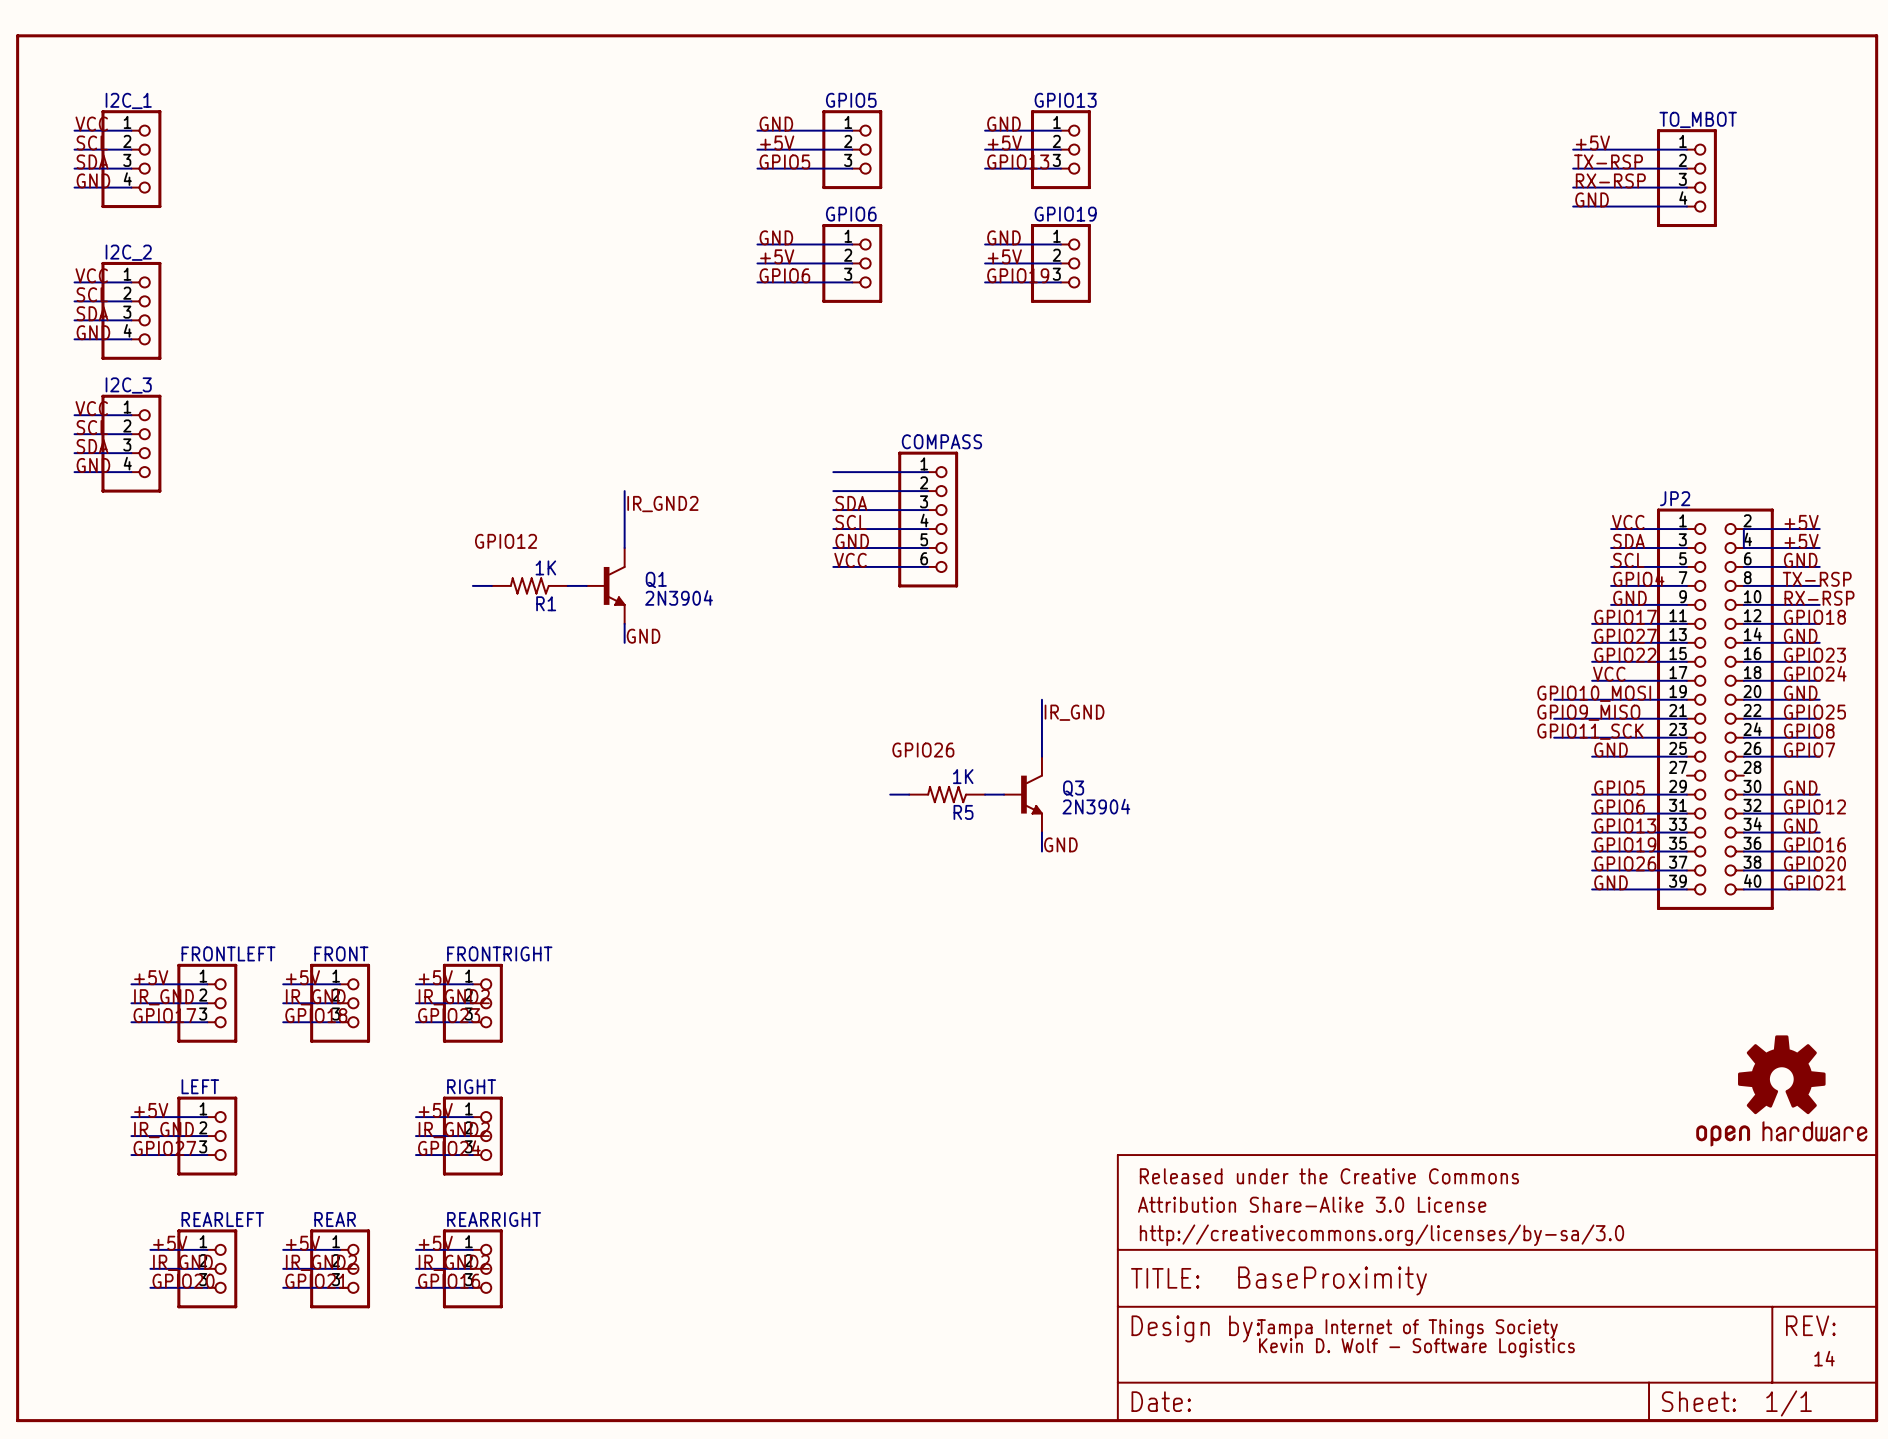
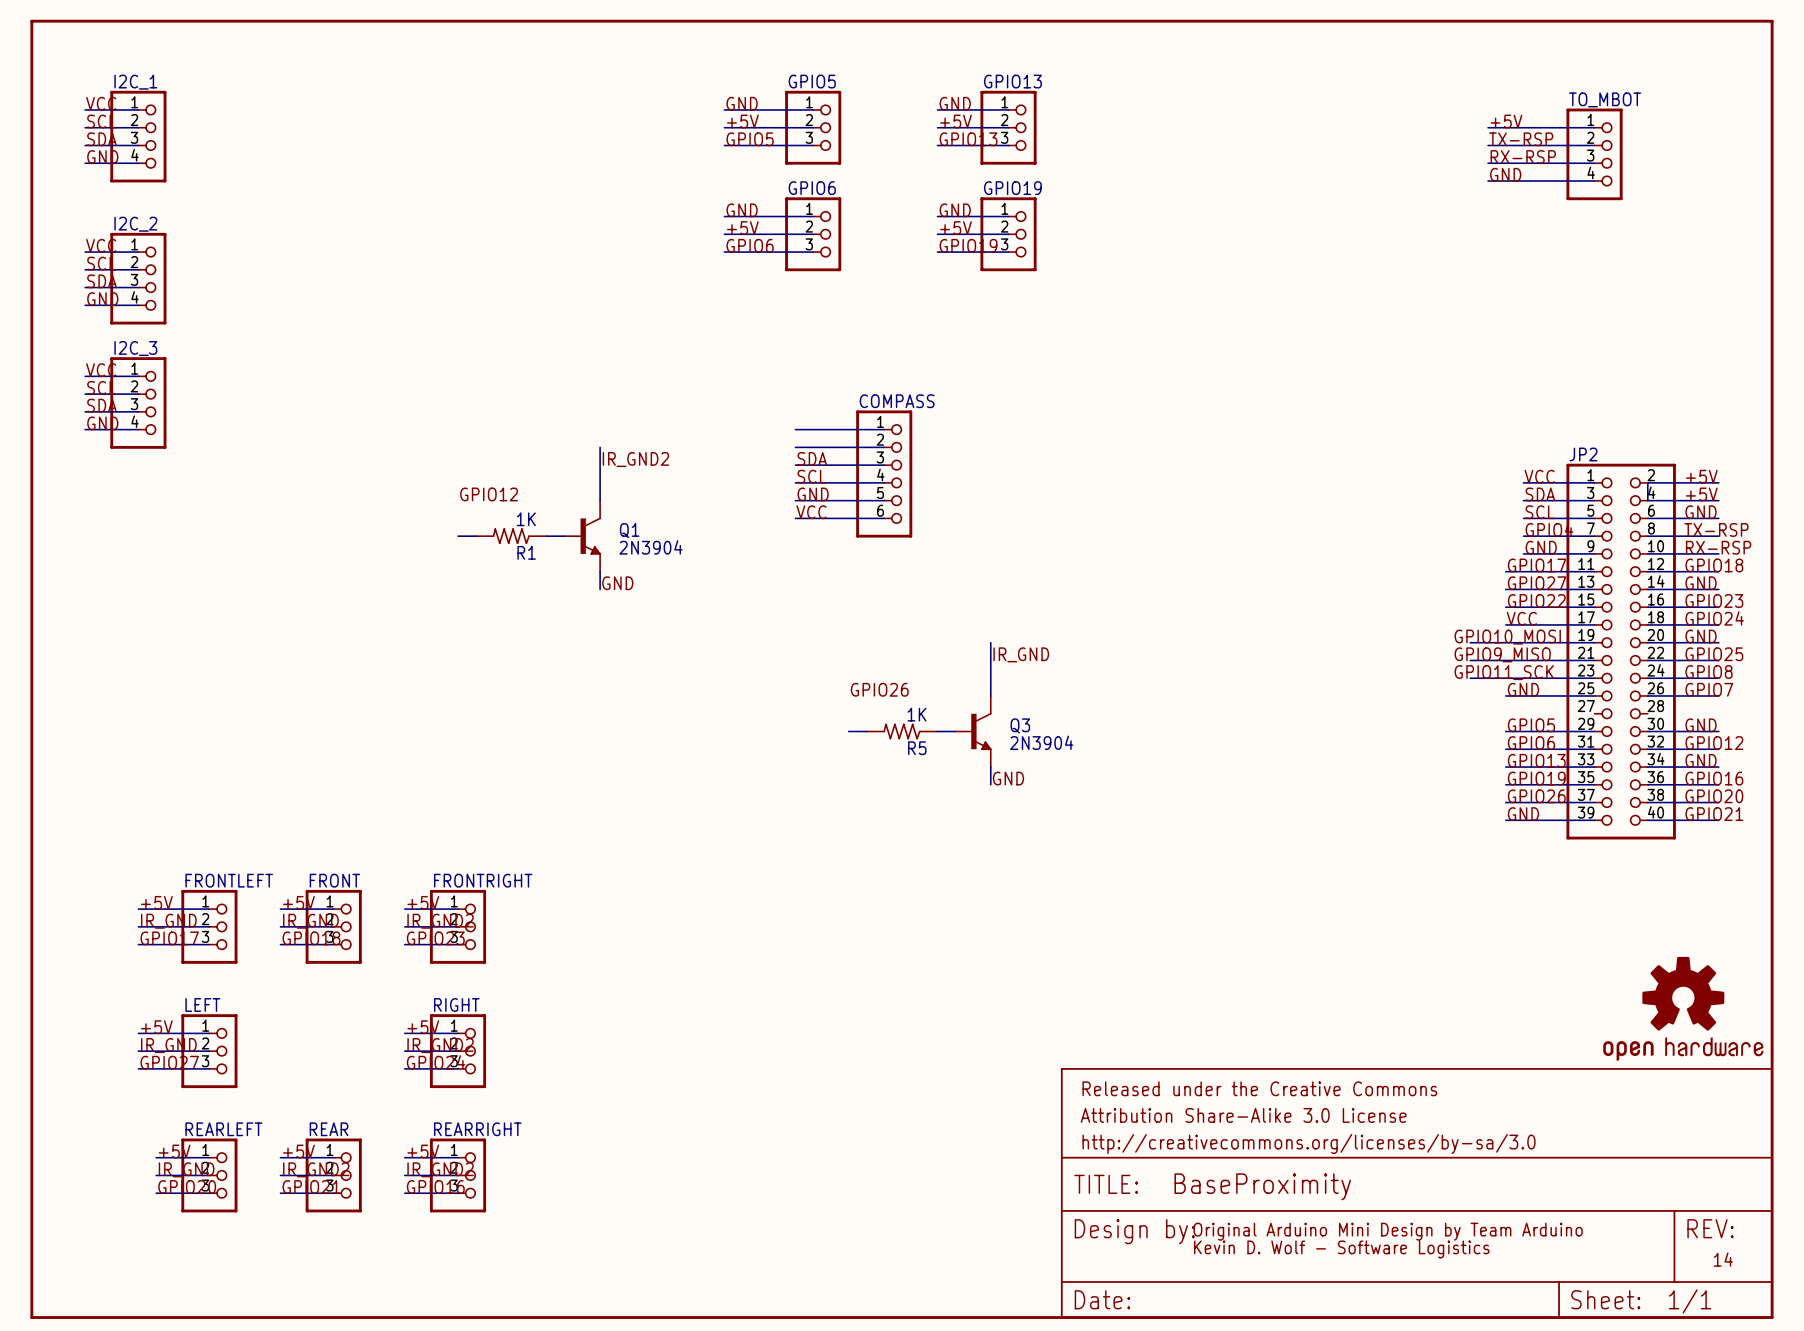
text: Tampa Internet of Things Society (1407, 1328) -> Original Arduino Mini Design by Team Arduino (1388, 1231)

